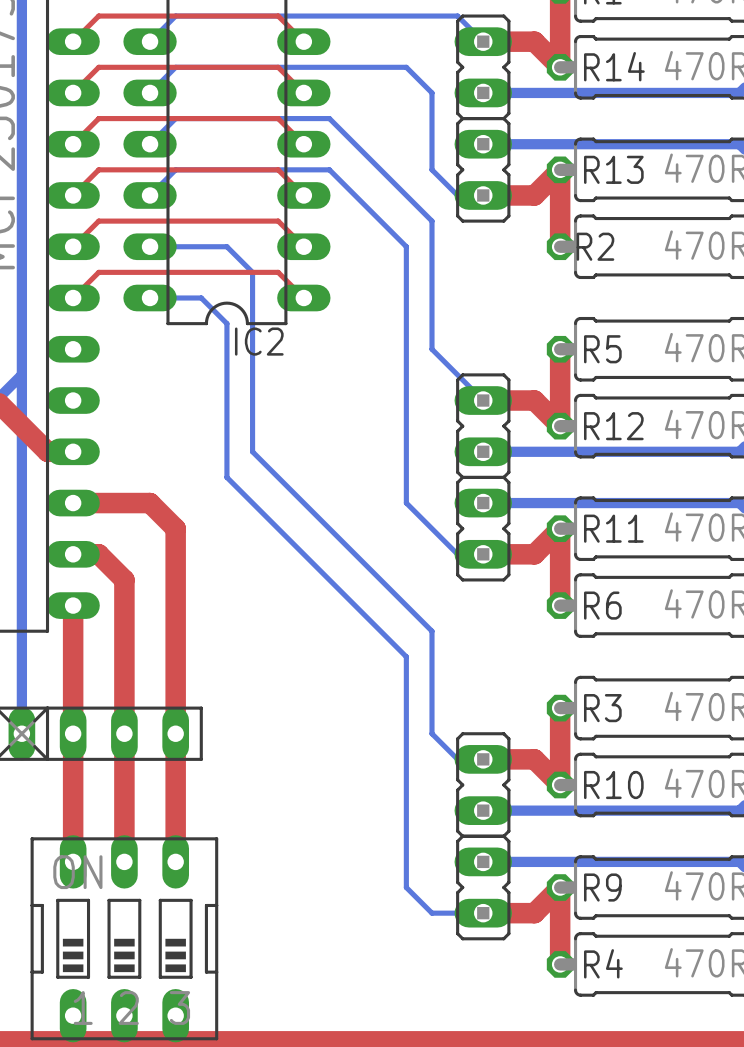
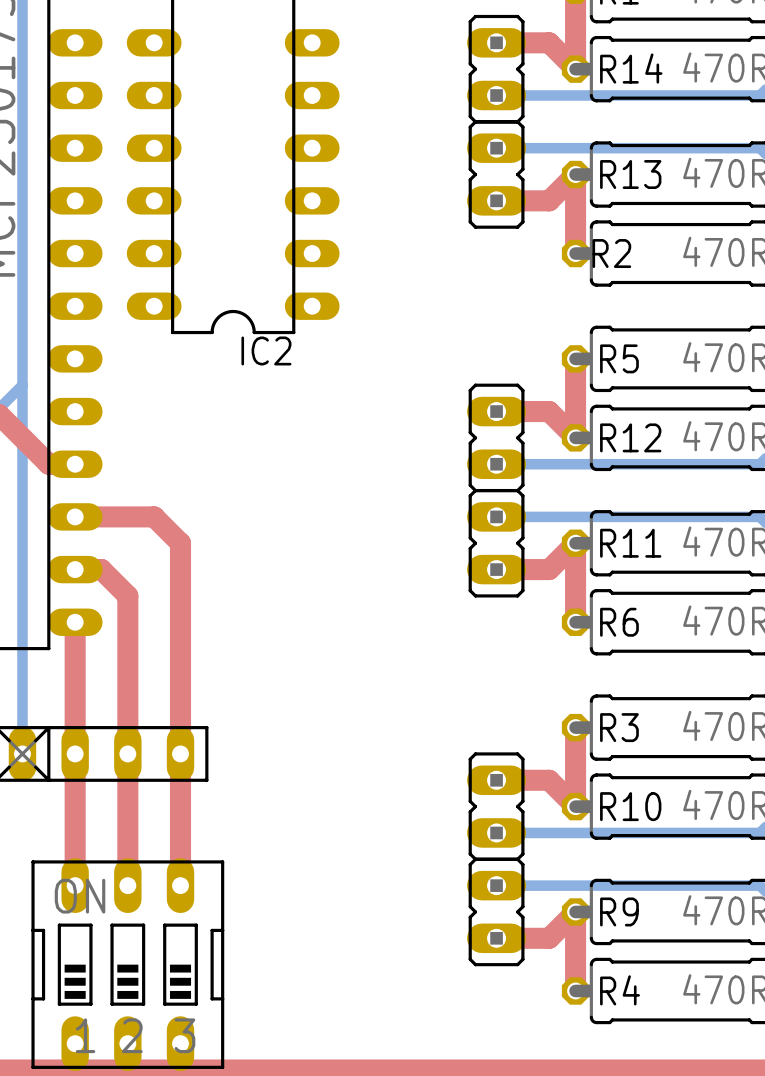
top track: (73, 41) (98, 16) (278, 16) (303, 41) -> none
bottom track: (150, 41) (175, 16) (457, 16) (483, 41) -> none
top track: (73, 92) (98, 67) (278, 67) (303, 92) -> none
bottom track: (150, 92) (175, 67) (406, 67) (431, 92) (431, 169) (457, 195) (483, 195) -> none
top track: (73, 144) (98, 118) (278, 118) (303, 144) -> none
bottom track: (150, 144) (175, 118) (329, 118) (431, 221) (431, 349) (483, 400) -> none
top track: (73, 195) (98, 169) (278, 169) (303, 195) -> none
bottom track: (150, 195) (175, 169) (329, 169) (406, 246) (406, 503) (457, 554) (483, 554) -> none
top track: (73, 246) (98, 221) (278, 221) (303, 246) -> none
bottom track: (150, 246) (226, 246) (252, 272) (252, 451) (431, 631) (431, 733) (457, 759) (483, 759) -> none
top track: (73, 297) (98, 272) (278, 272) (303, 297) -> none
bottom track: (150, 297) (201, 297) (226, 323) (226, 477) (406, 656) (406, 887) (431, 913) (483, 913) -> none

